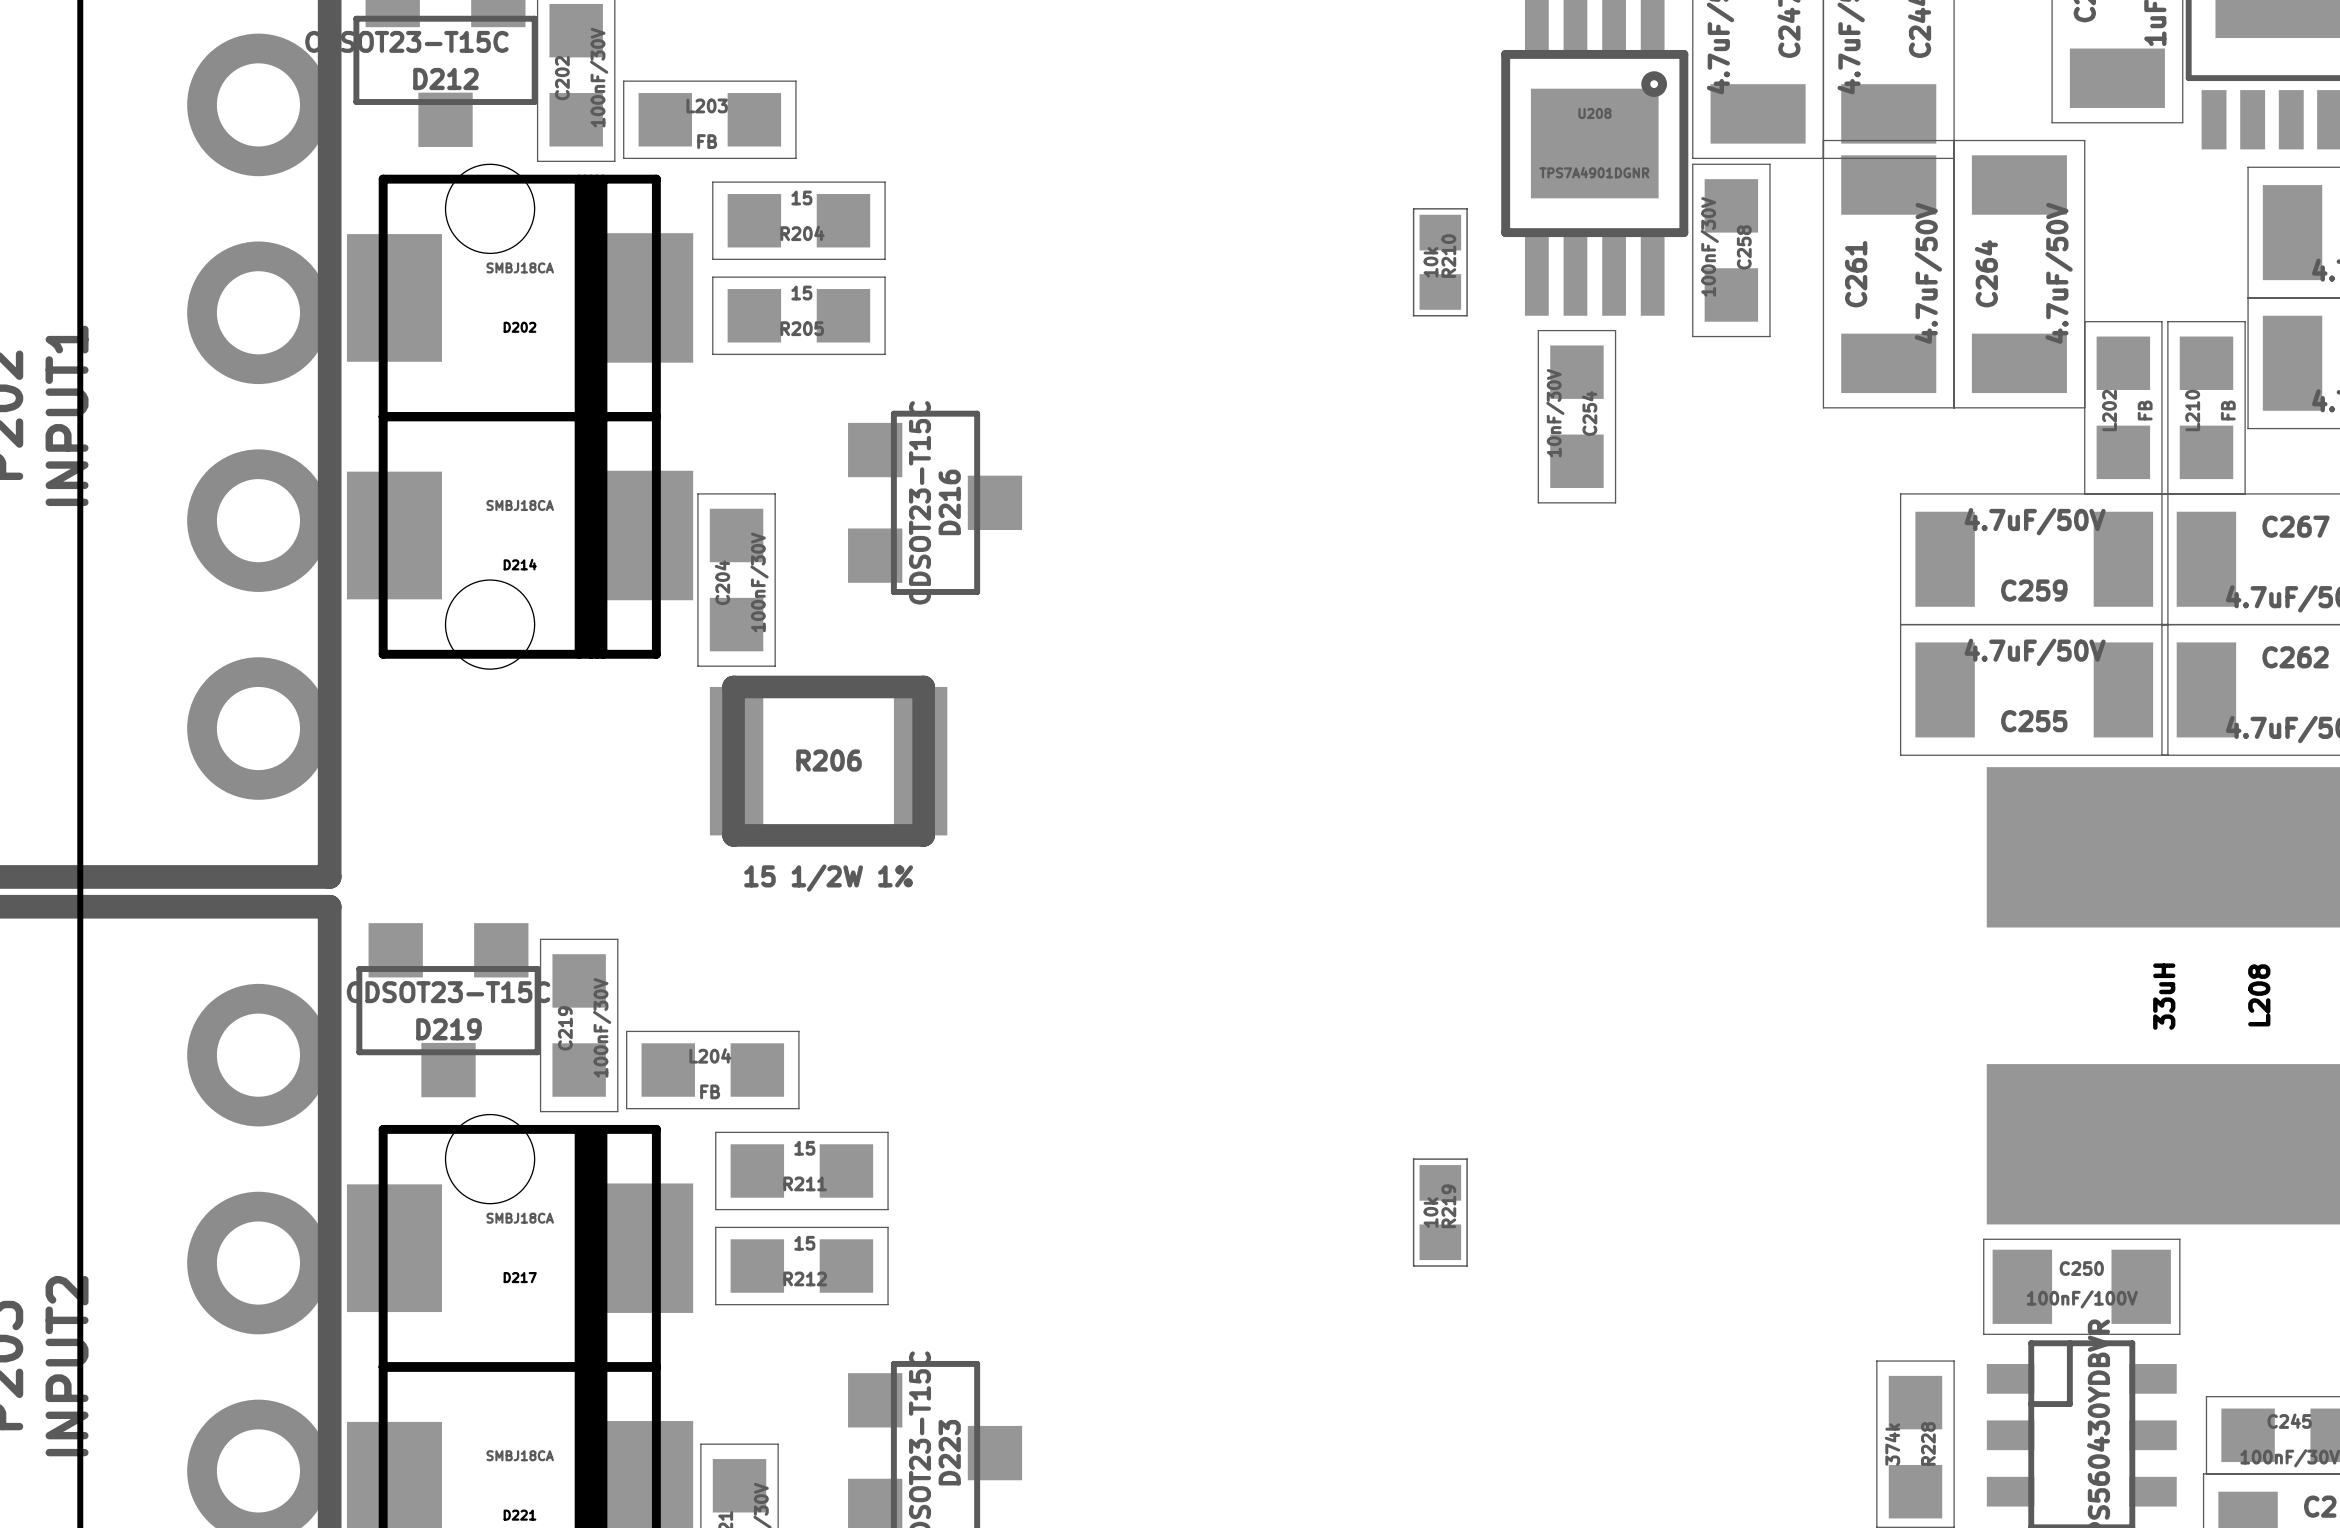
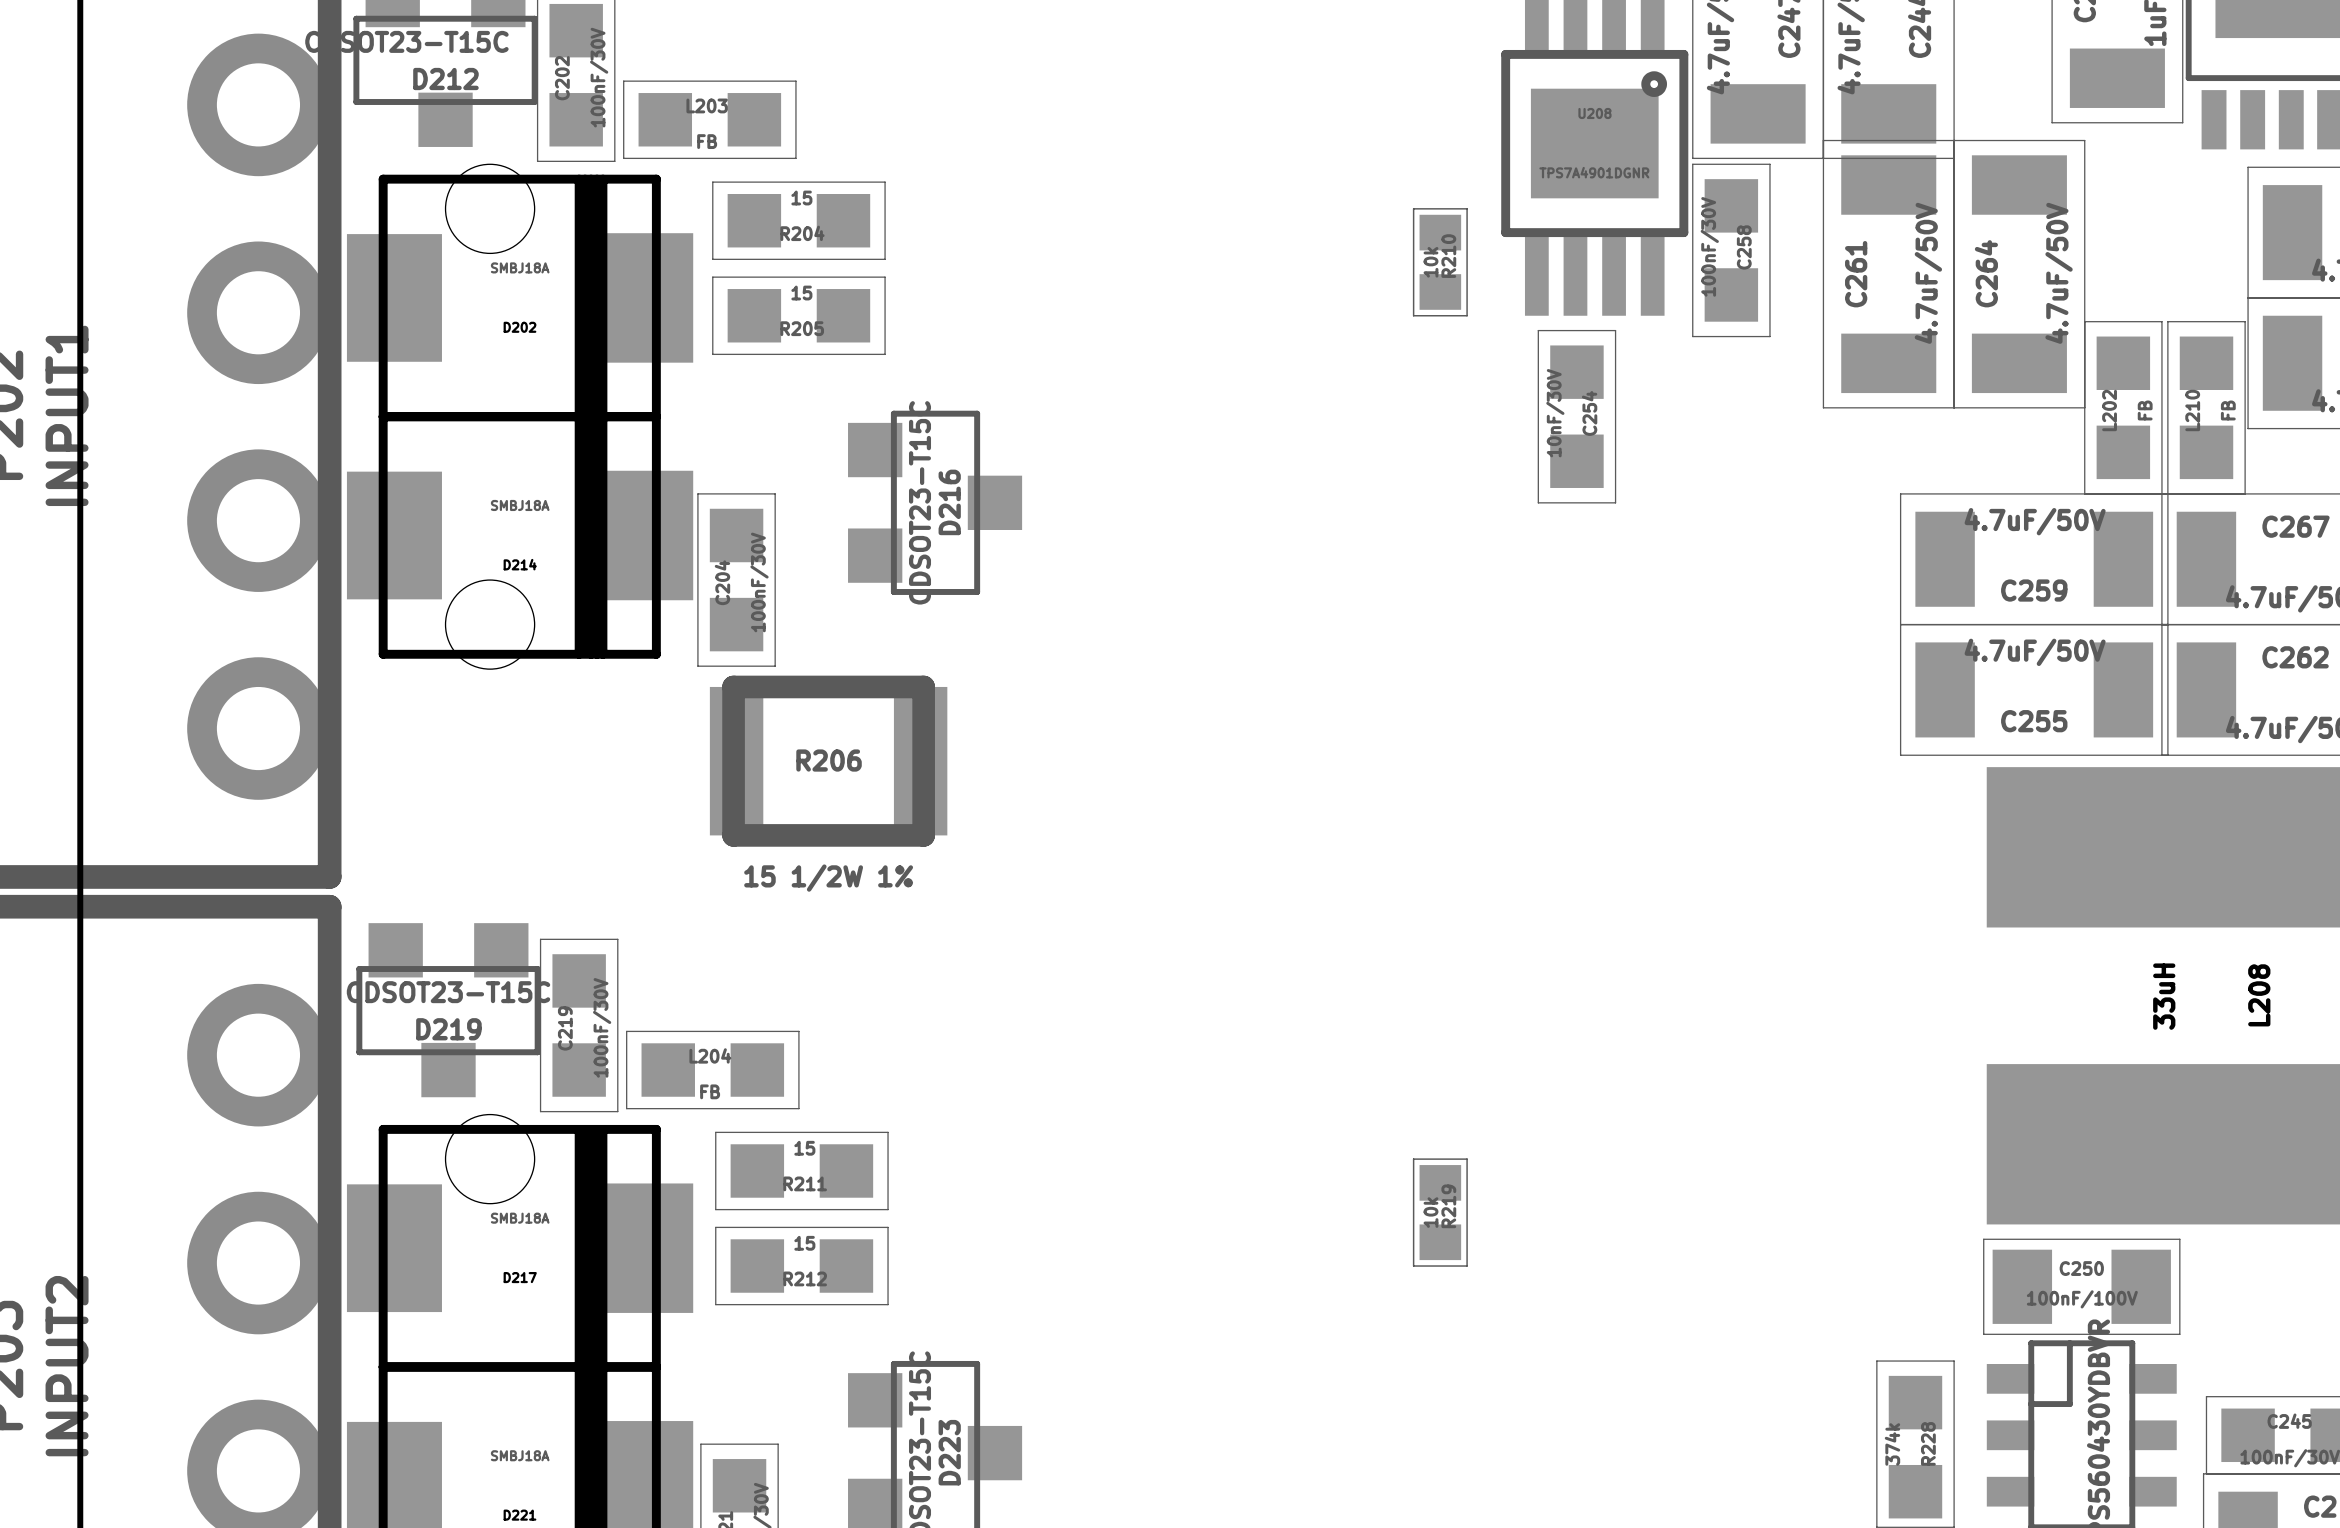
D202 value: SMBJ18CA (520, 267) -> SMBJ18A (520, 267)
D214 value: SMBJ18CA (520, 505) -> SMBJ18A (520, 505)
D217 value: SMBJ18CA (520, 1218) -> SMBJ18A (520, 1218)
D221 value: SMBJ18CA (520, 1455) -> SMBJ18A (520, 1455)

